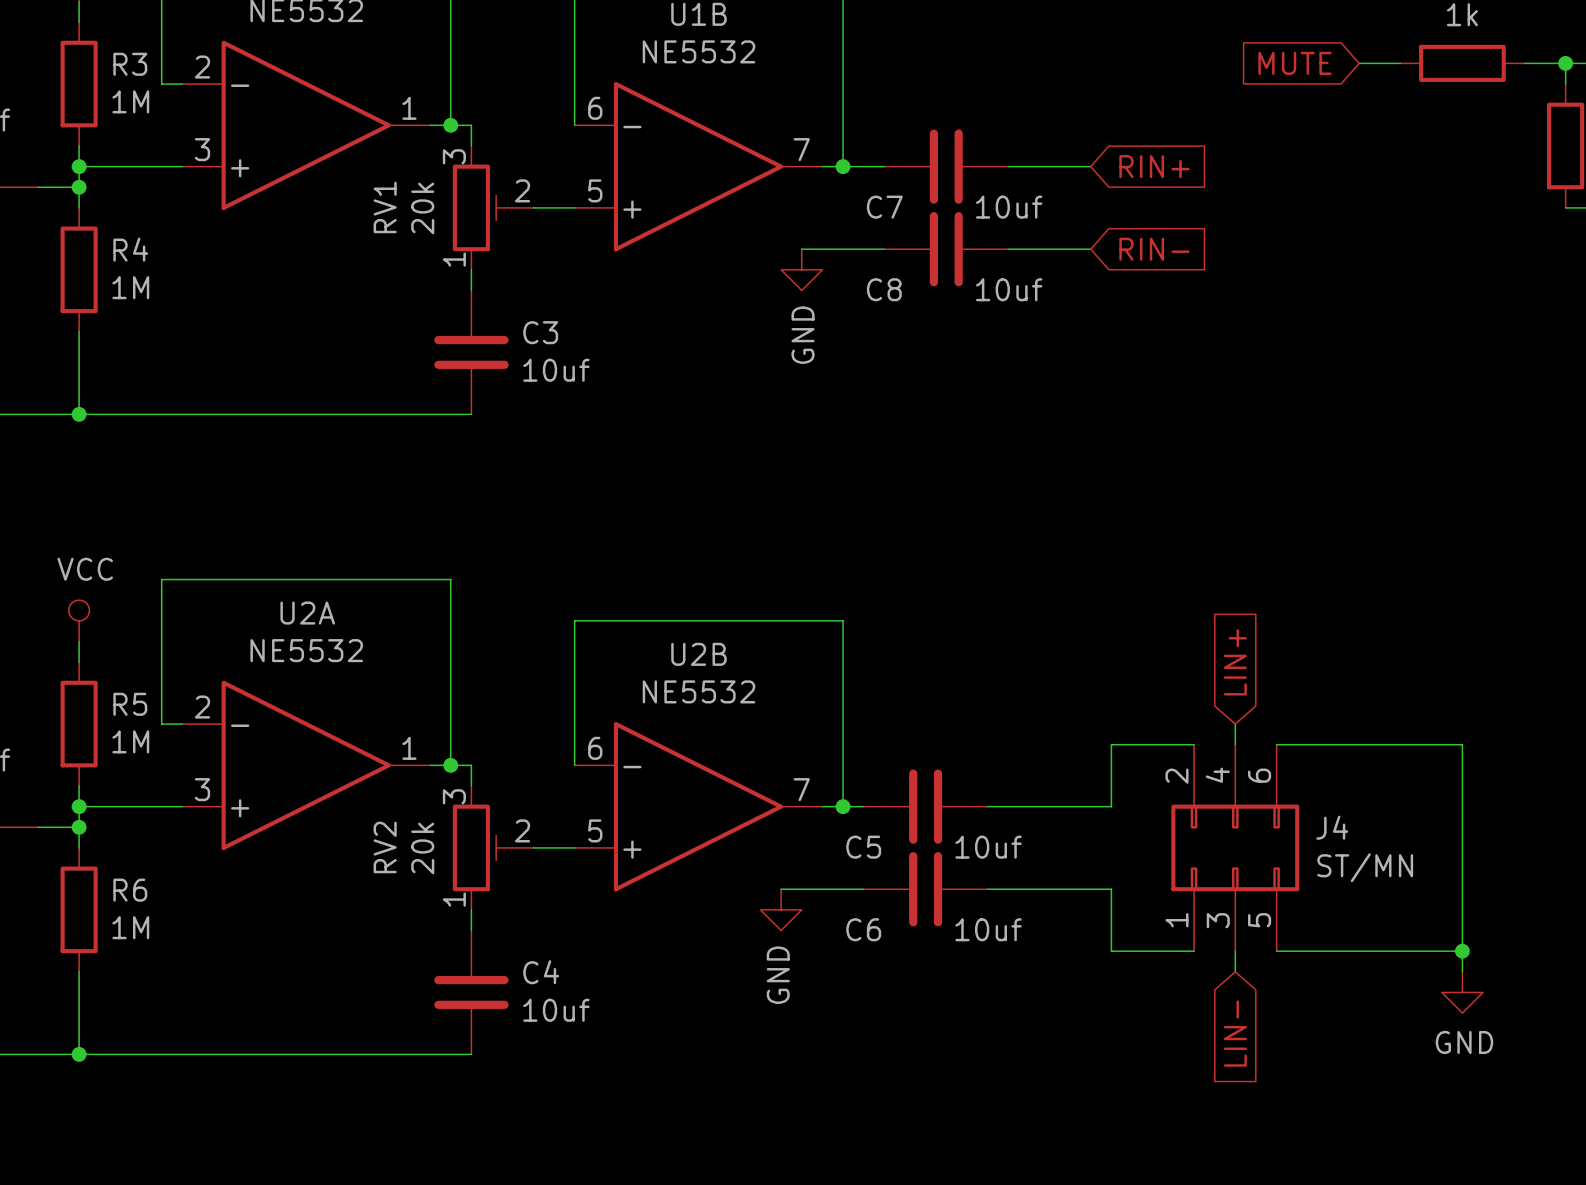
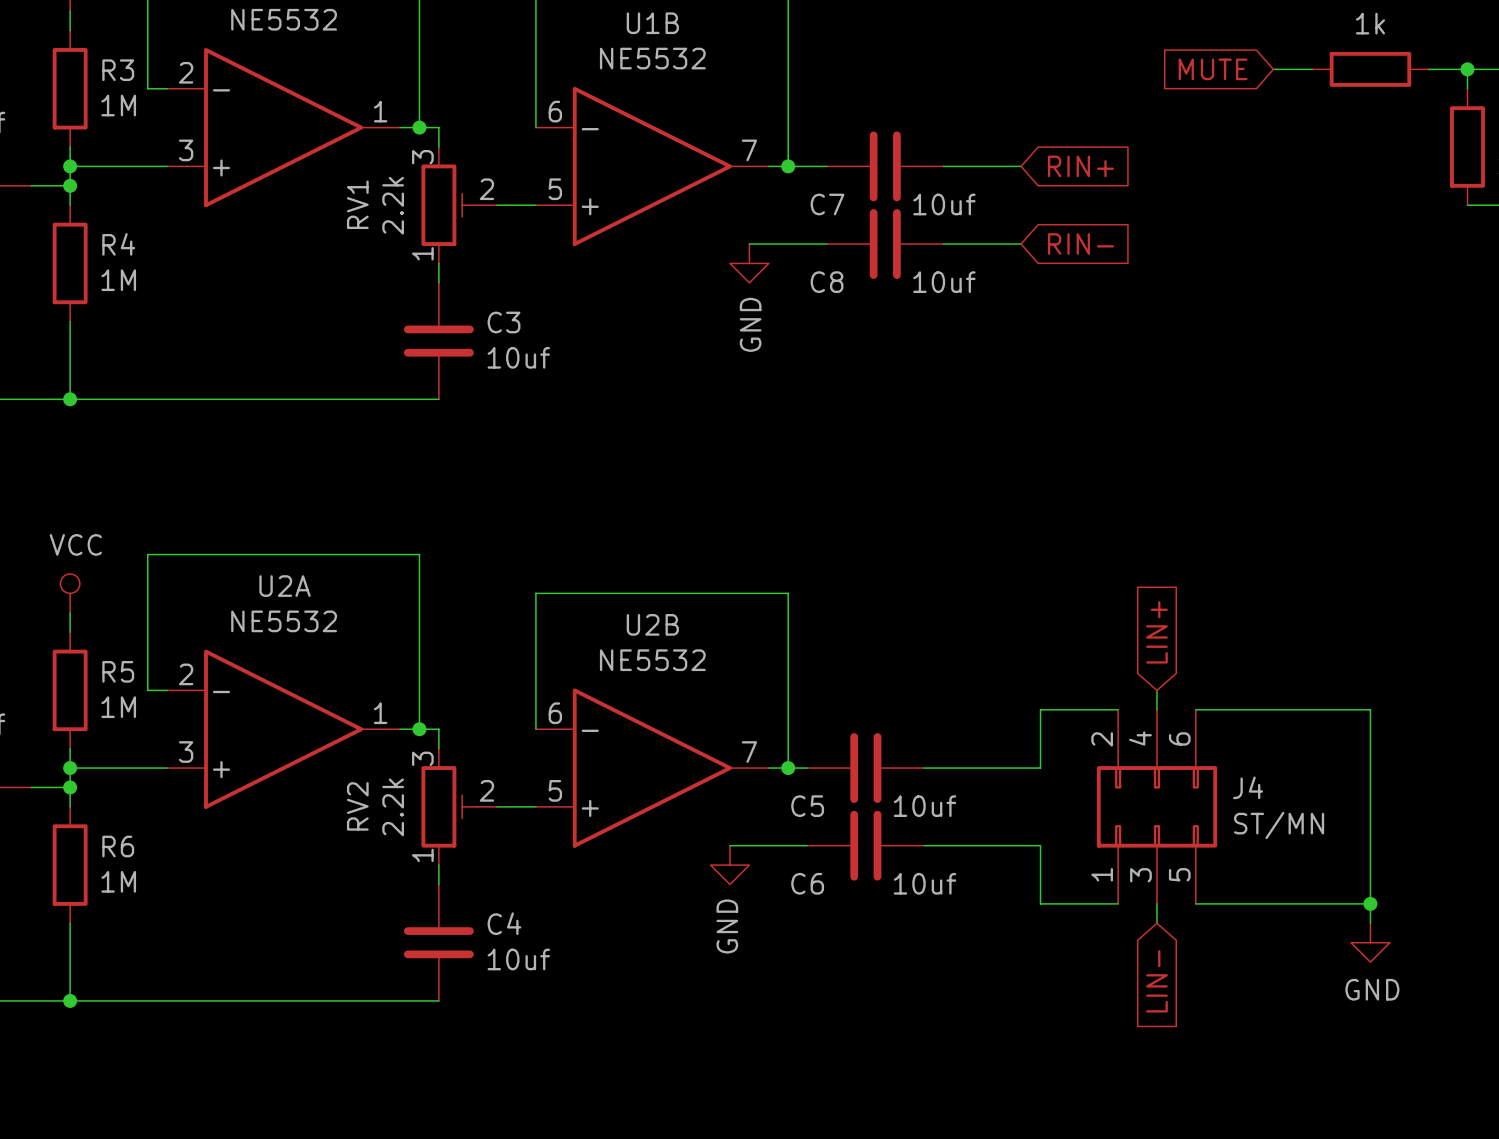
RV1 value: 20k (422, 208) -> 2.2k (393, 205)
RV2 value: 20k (422, 848) -> 2.2k (393, 807)

